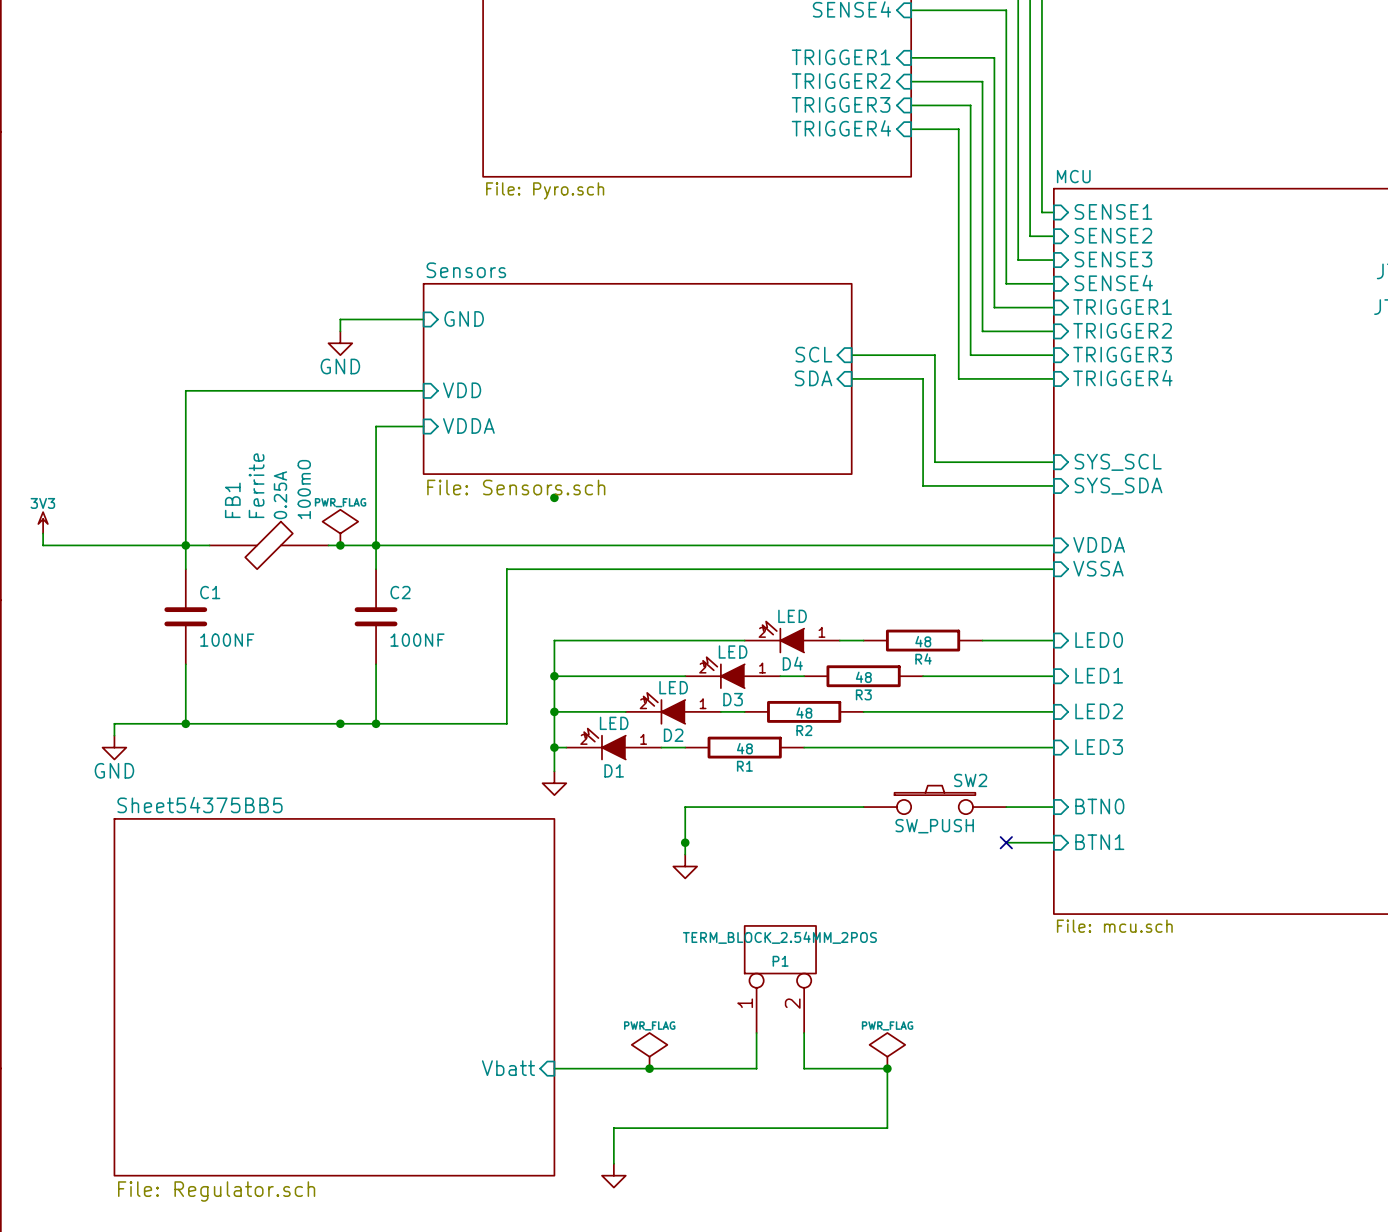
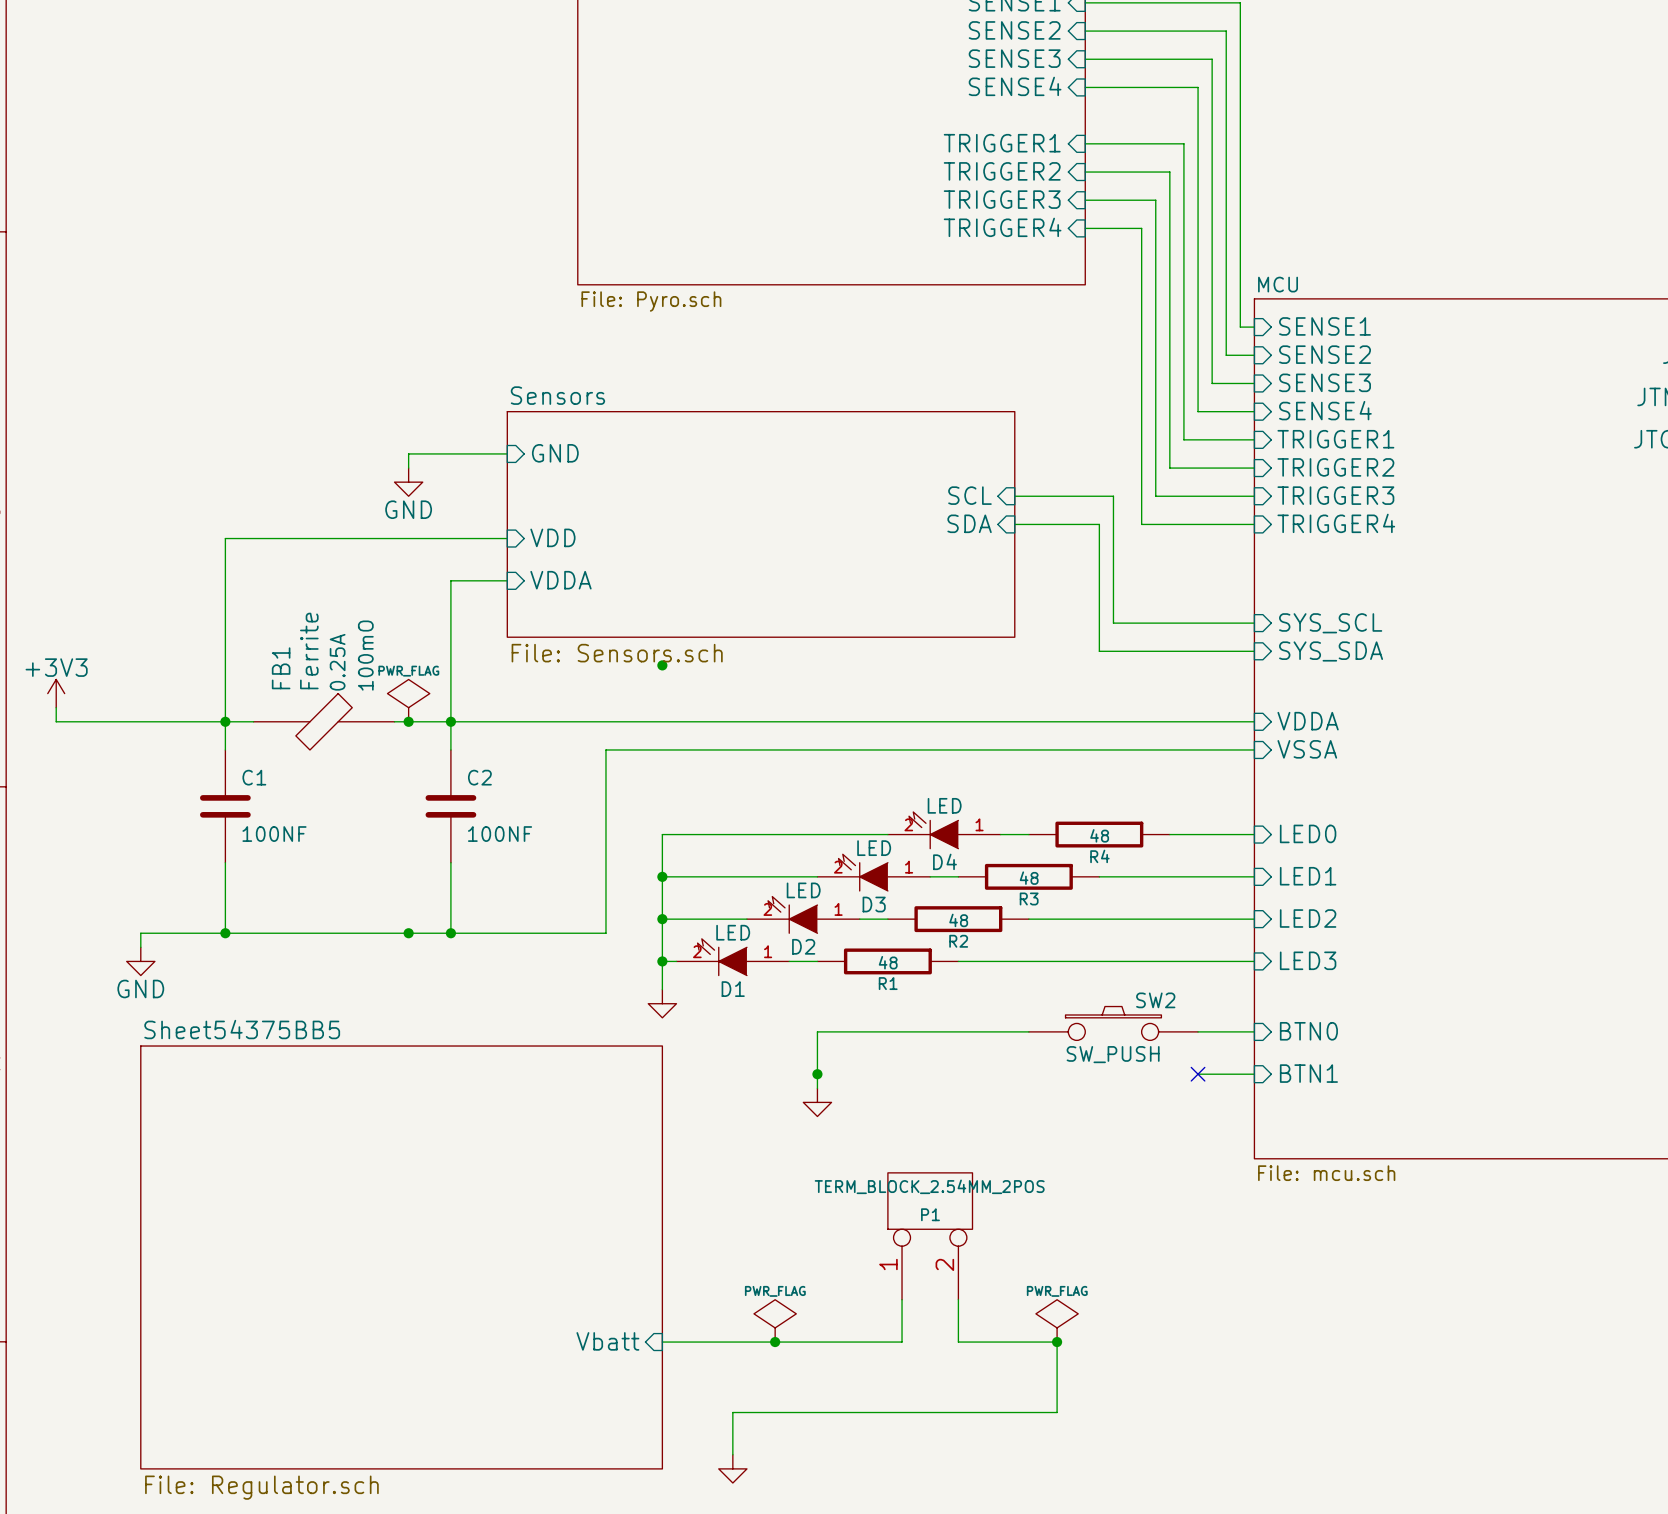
power symbol: 3V3 (43, 522) -> +3V3 (56, 693)

